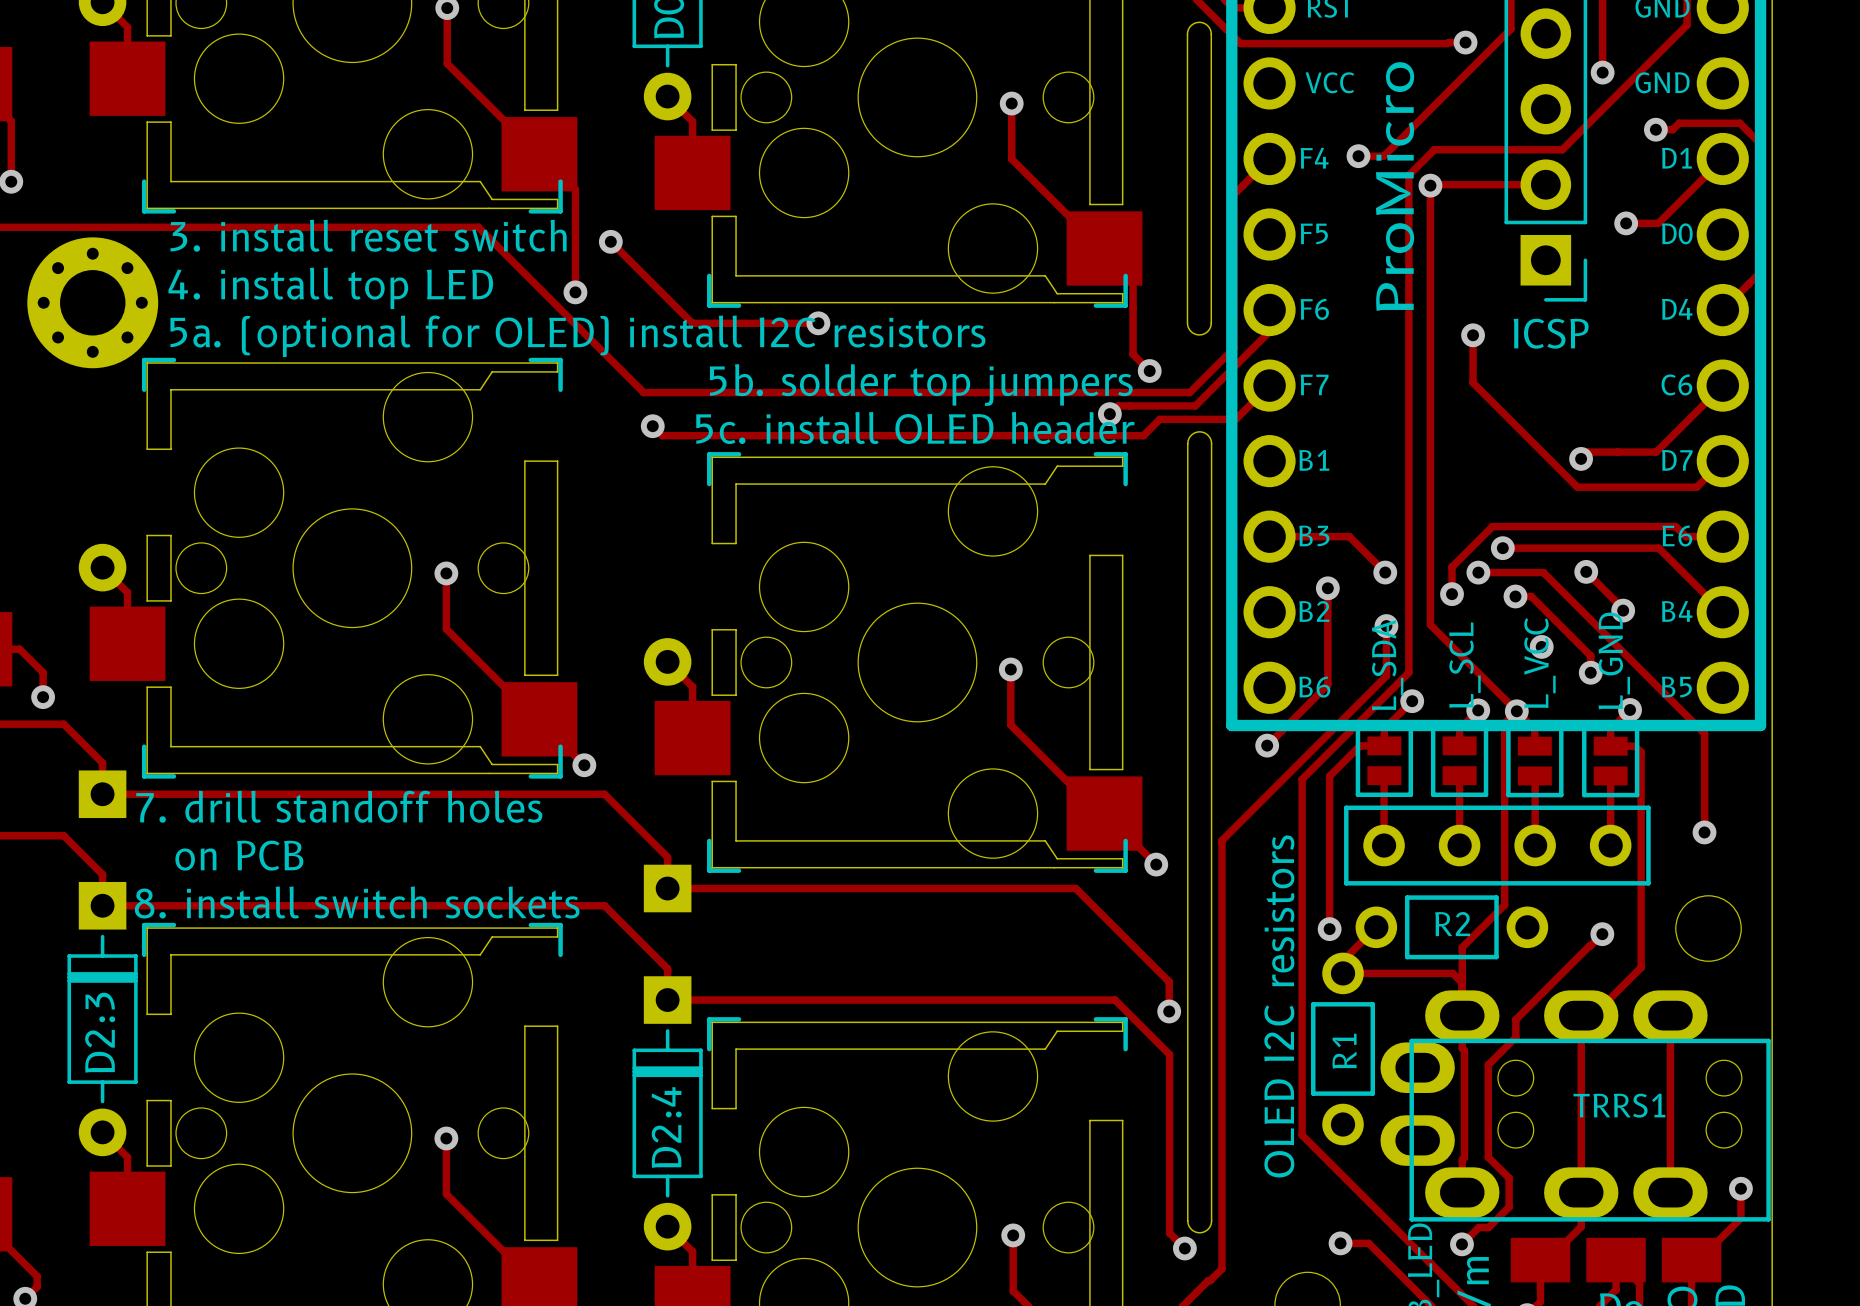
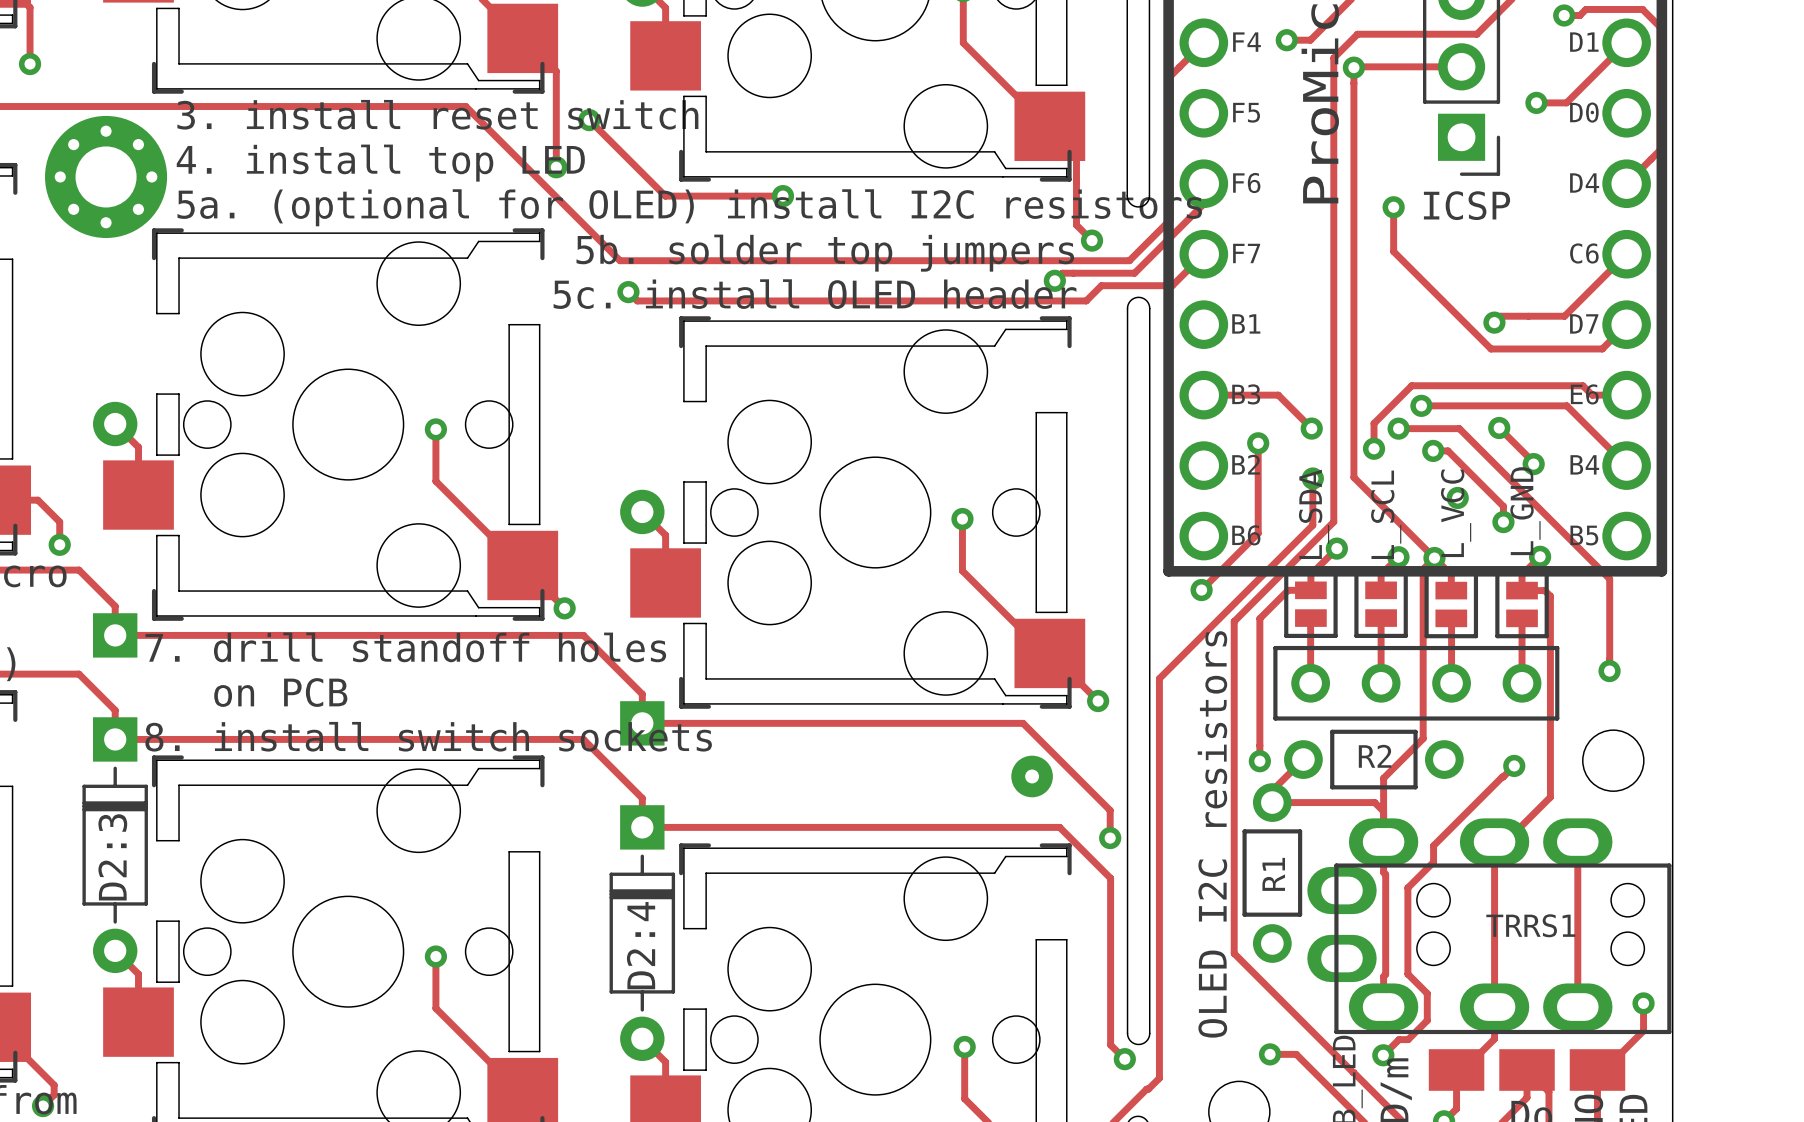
part: none -> (1032, 776)

